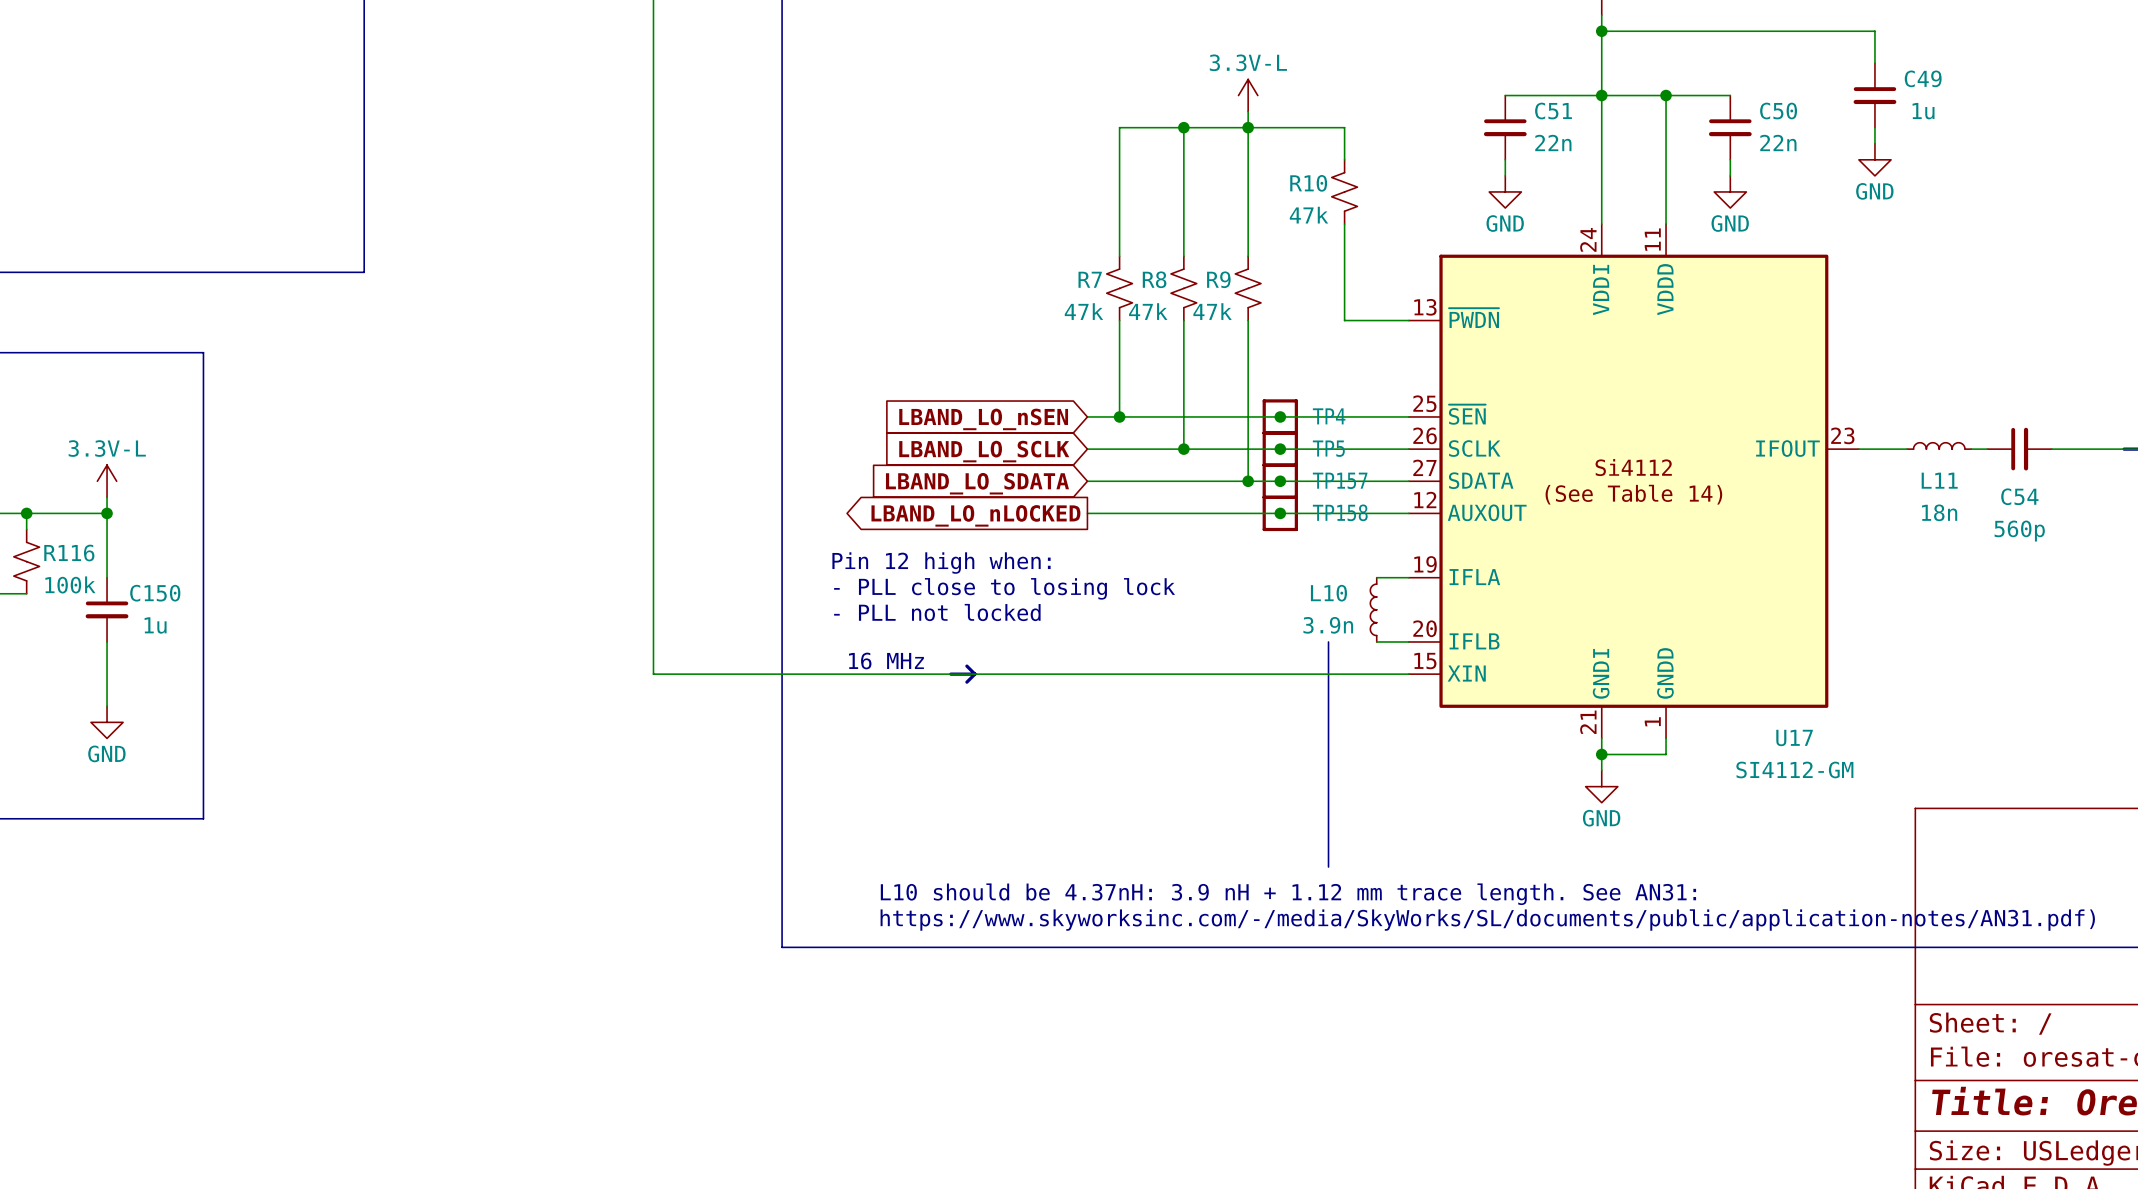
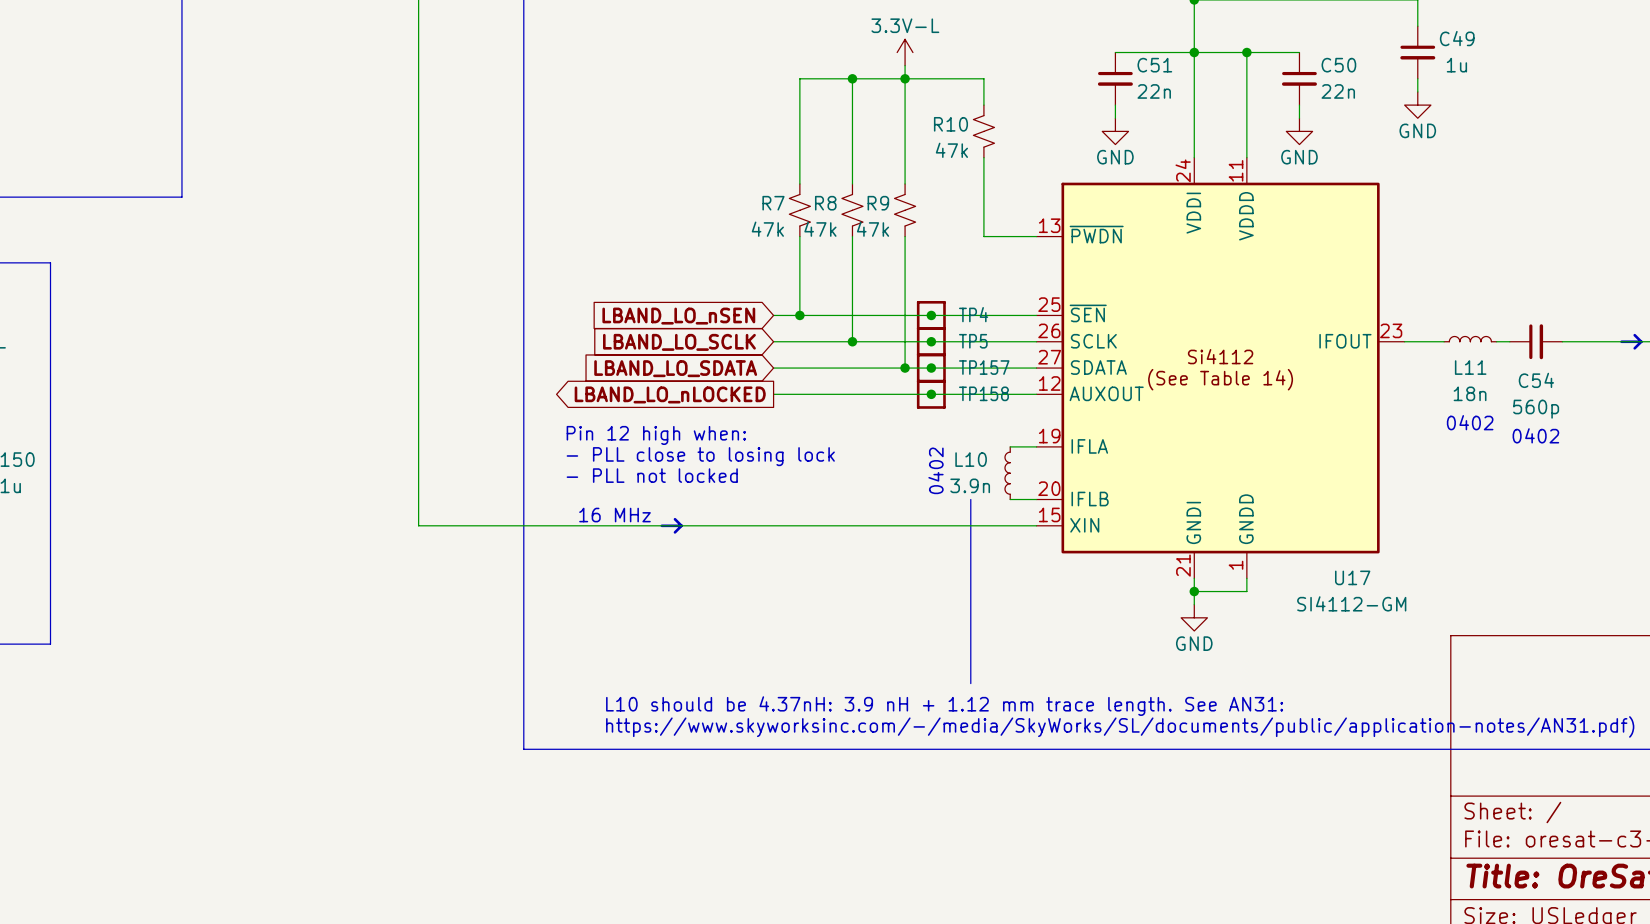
text: none -> 0402 (1470, 422)
text: none -> 0402 (1535, 435)
text: none -> 0402 (936, 470)

